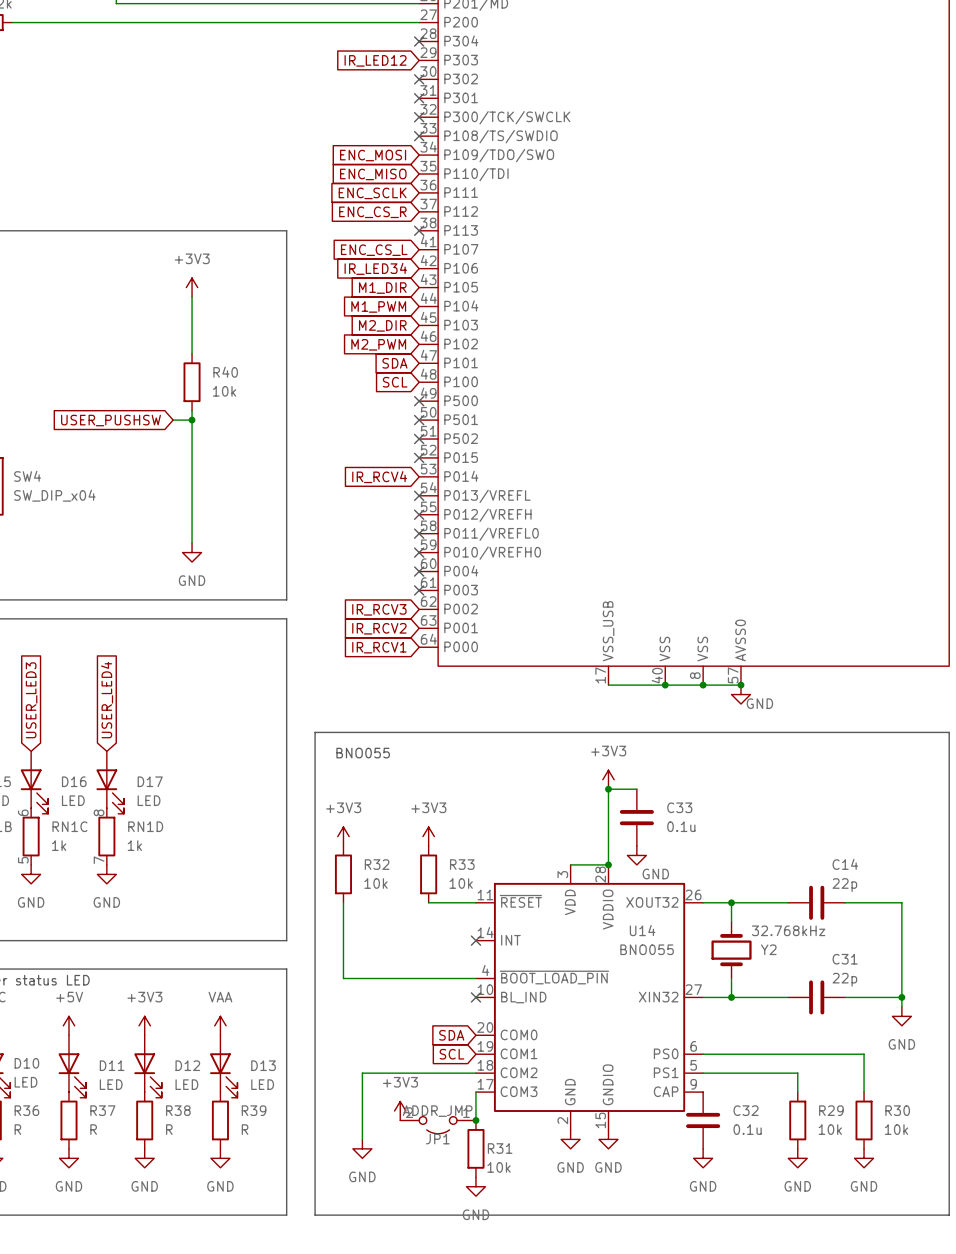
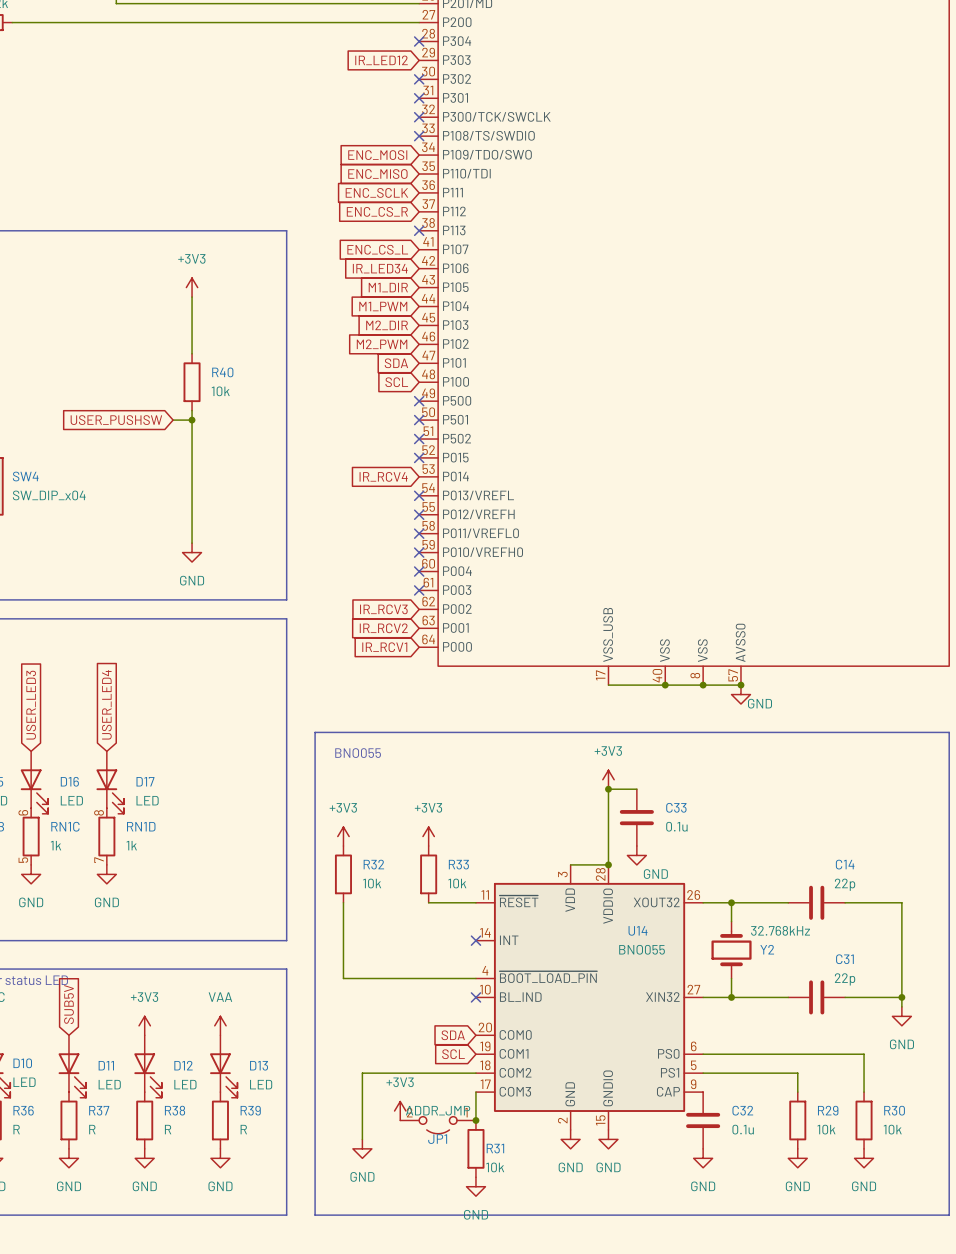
global label: none -> SUB5V (68, 1004)
power symbol: +5V (68, 1025) -> none

